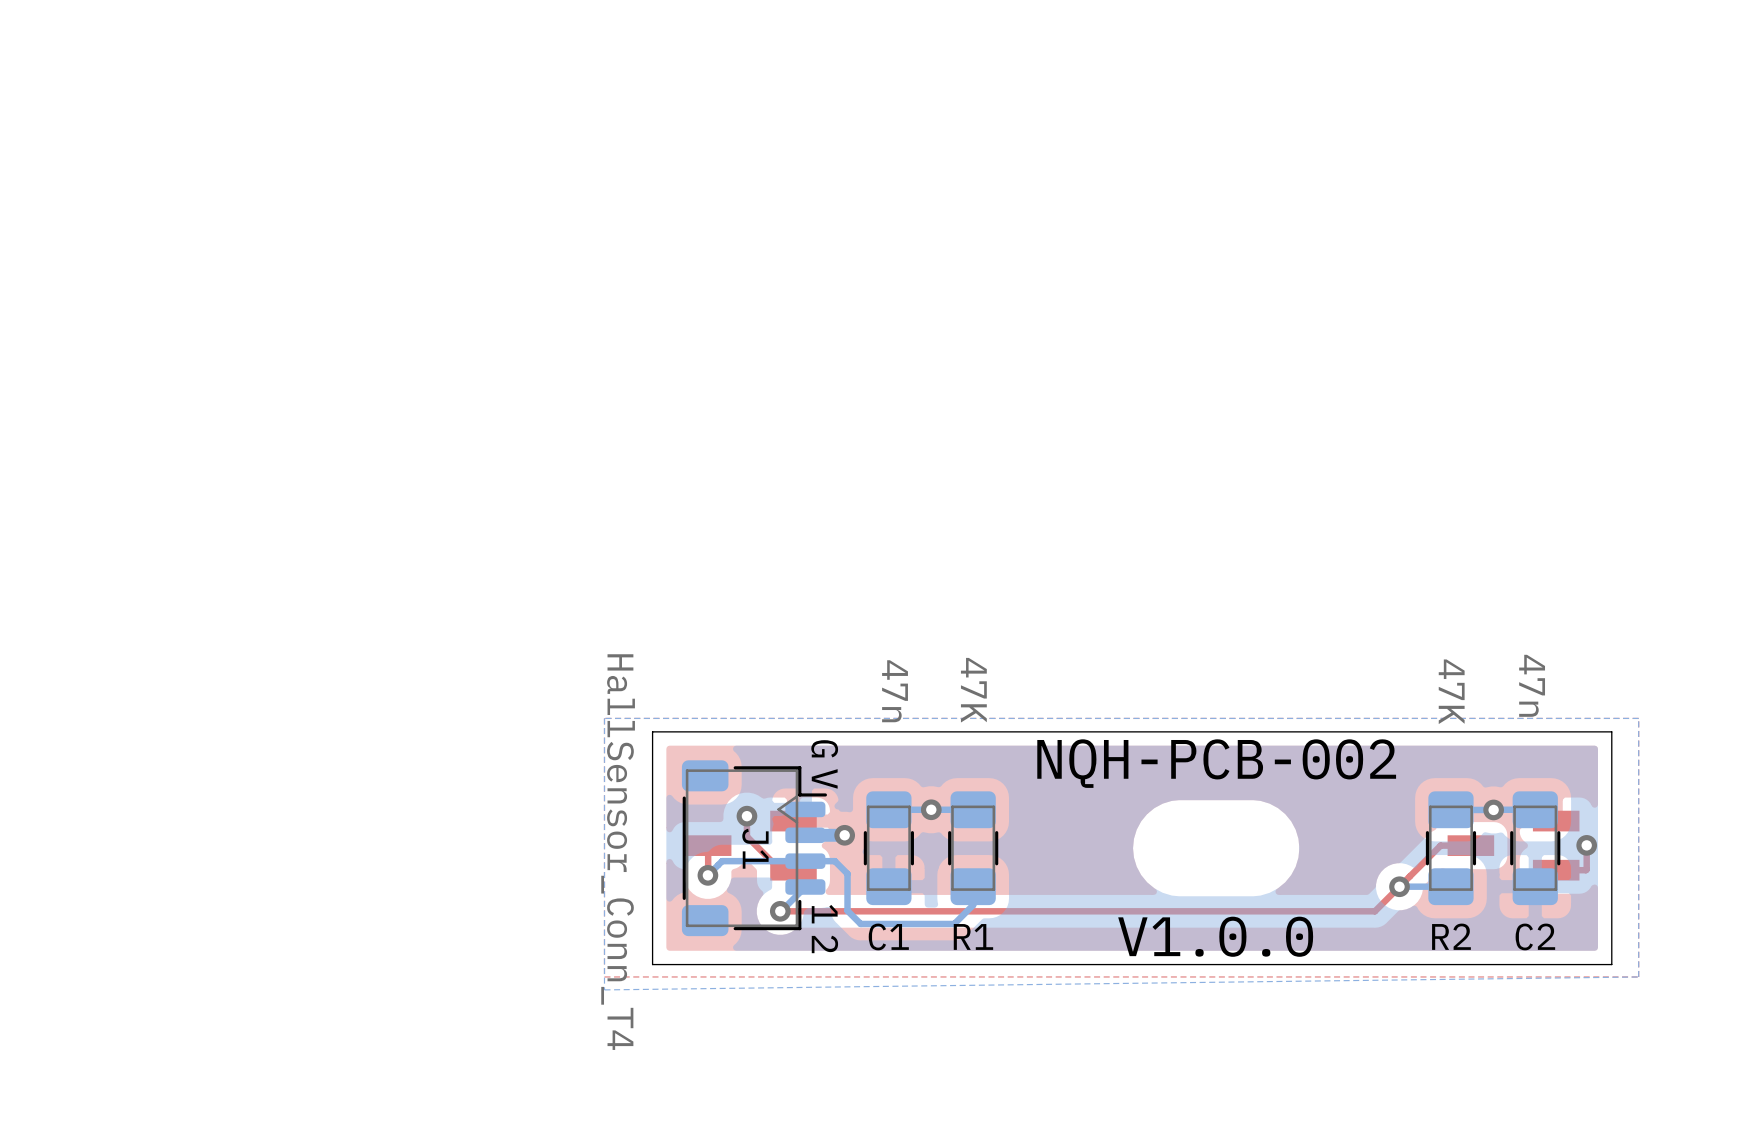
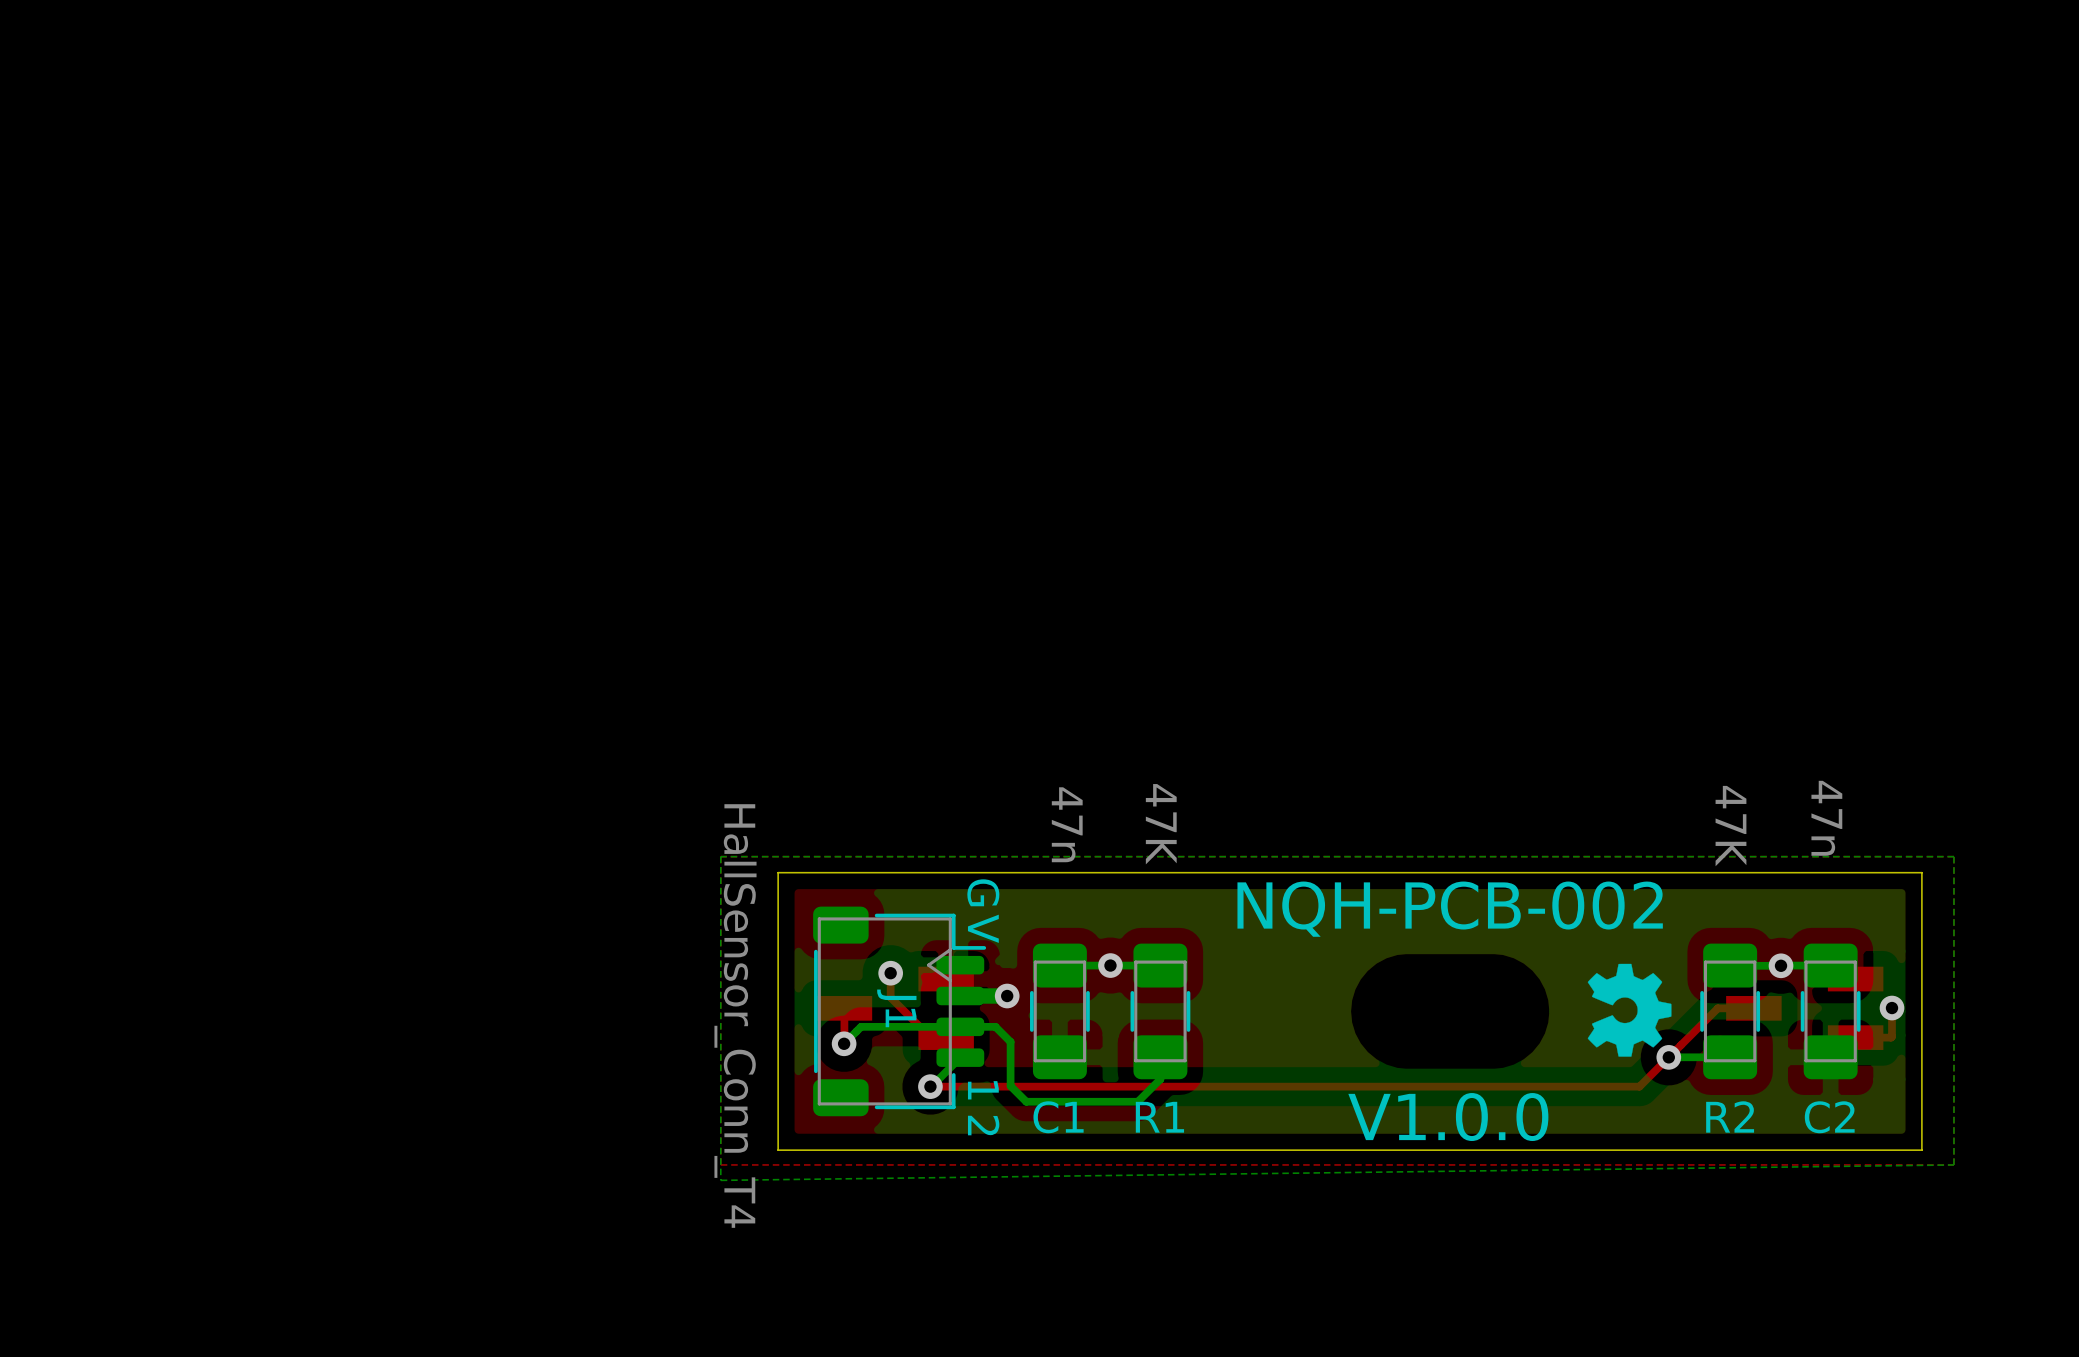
drawing: none -> [1587, 963, 1672, 1057]

